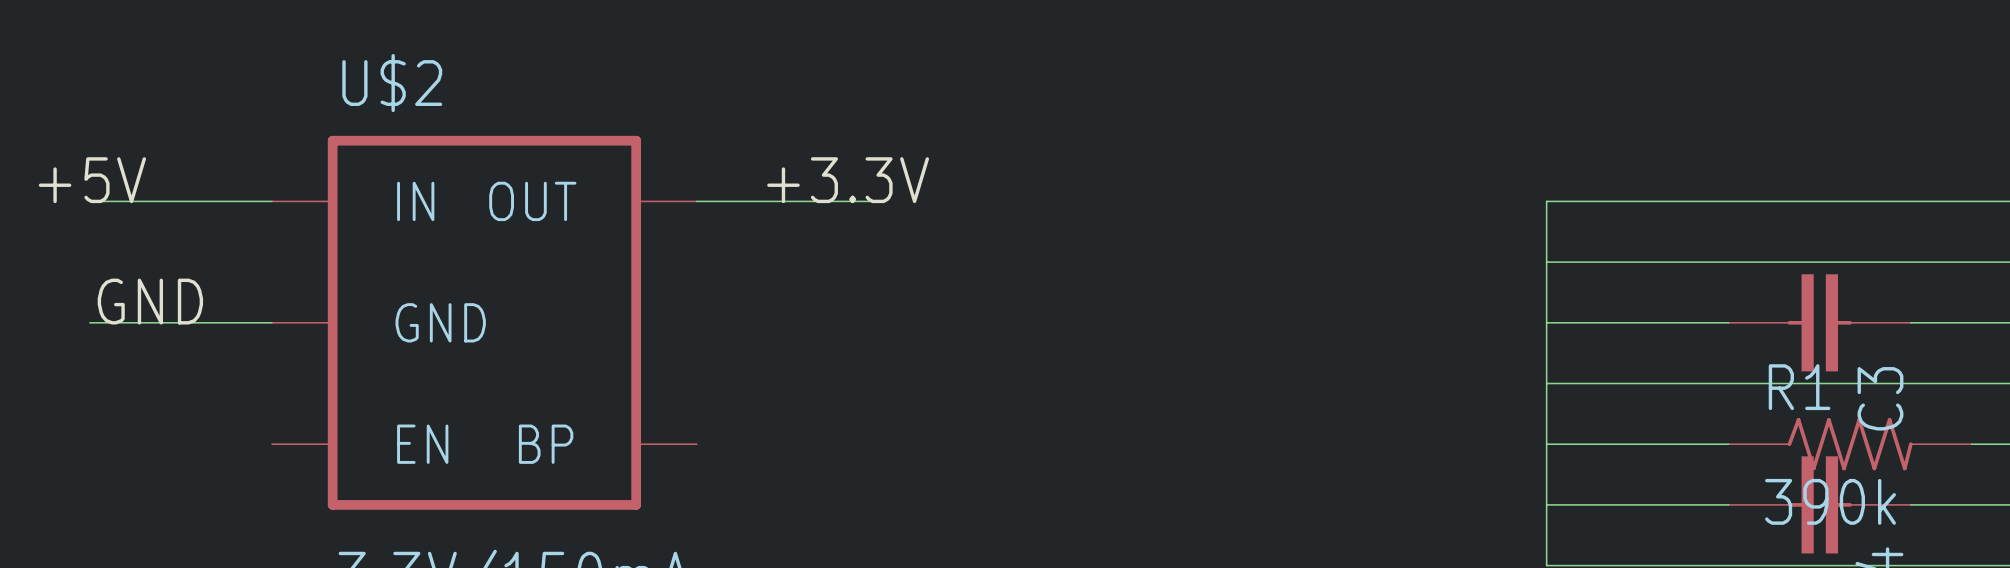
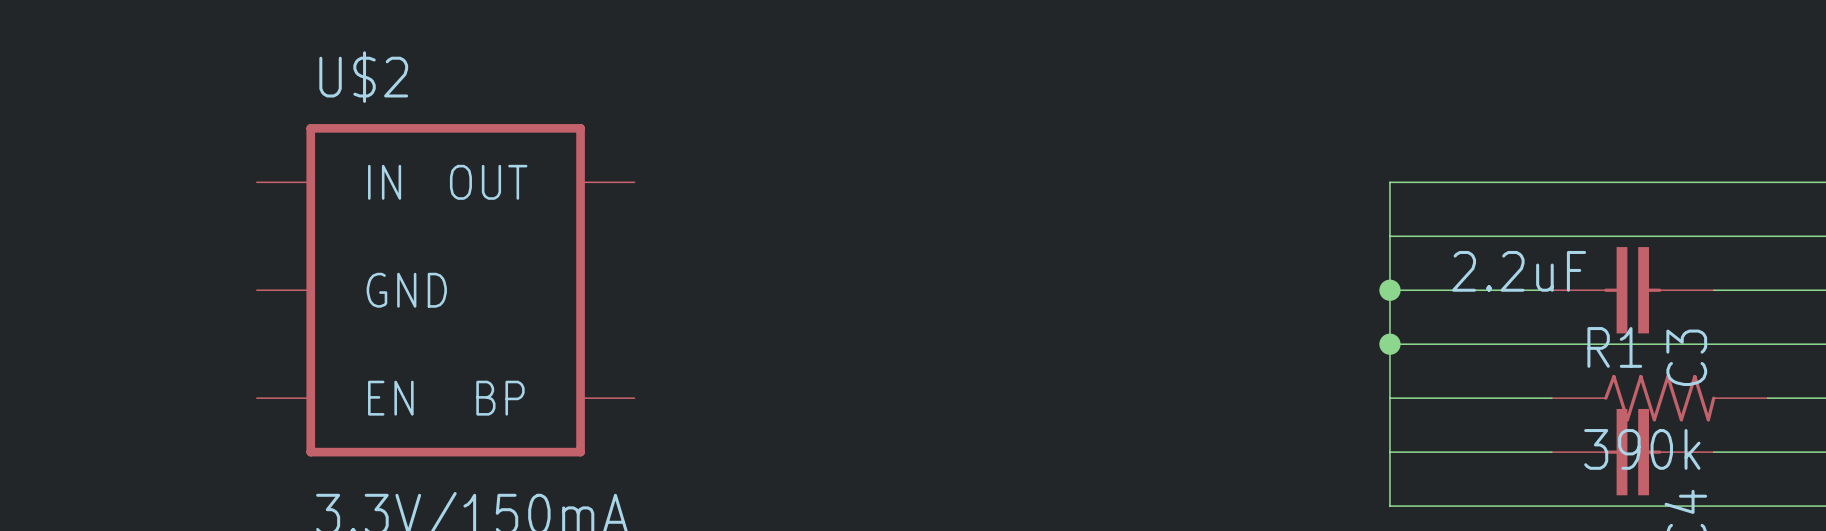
label: +5V (92, 180) -> none
label: +3.3V (848, 180) -> none
wire: (89, 201) (271, 201) -> none
wire: (696, 201) (878, 201) -> none
label: GND (150, 301) -> none
C3 value: none -> 2.2uF (1519, 271)
wire: (89, 322) (271, 322) -> none
junction: none -> (1389, 290)
junction: none -> (1389, 344)

